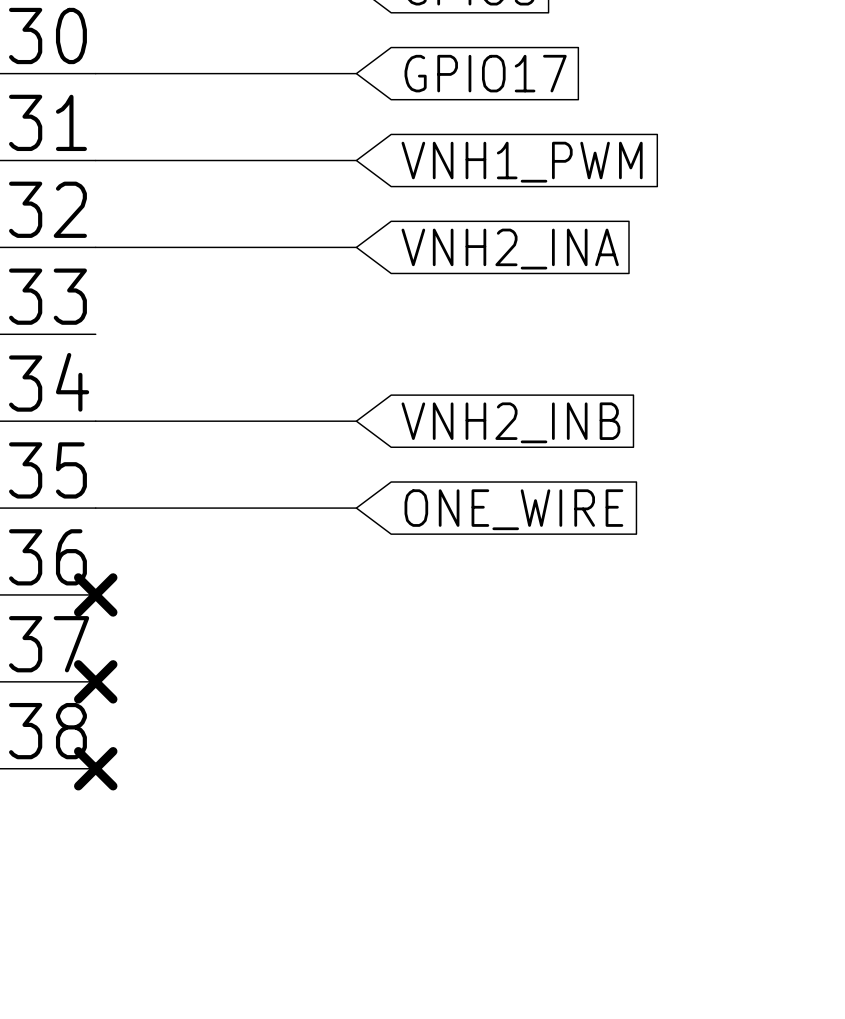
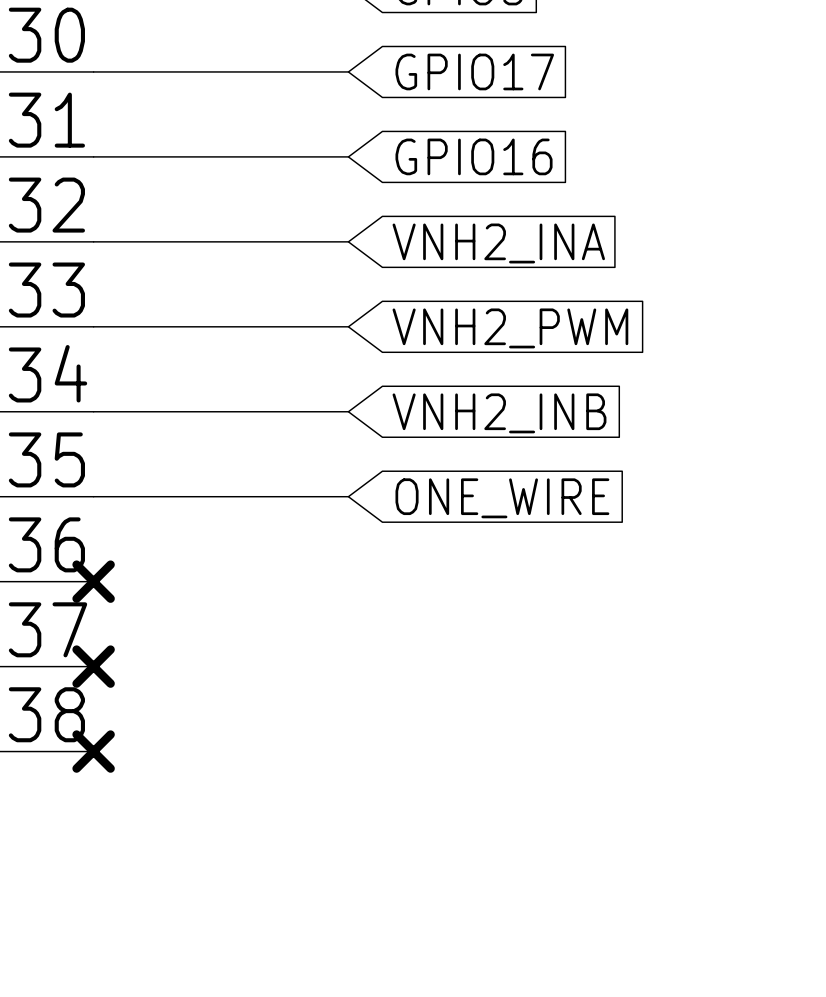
global label: VNH1_PWM (522, 162) -> GPIO16 (474, 156)
wire: none -> (93, 326) (348, 326)
global label: none -> VNH2_PWM (510, 328)

